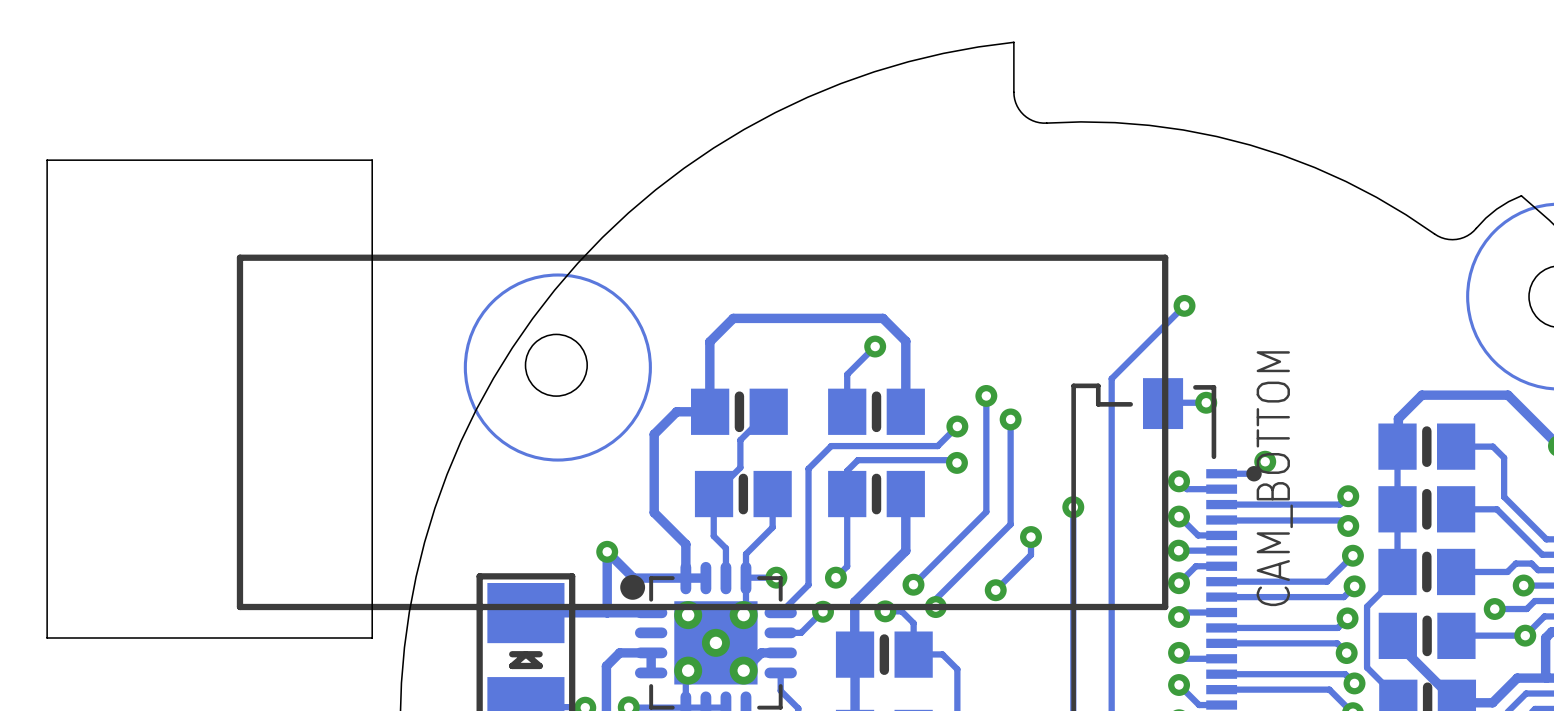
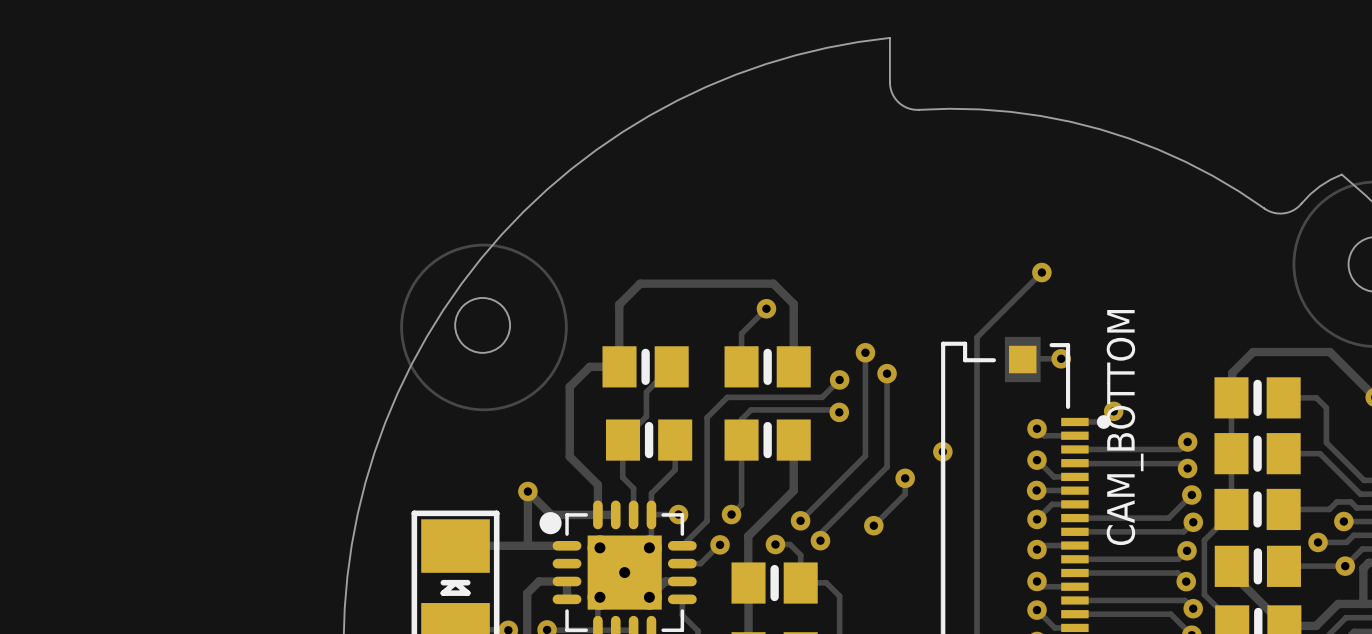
board edge: (372, 160) (47, 160) (47, 637) (372, 637) (372, 160) -> none
part: (702, 432) -> none

